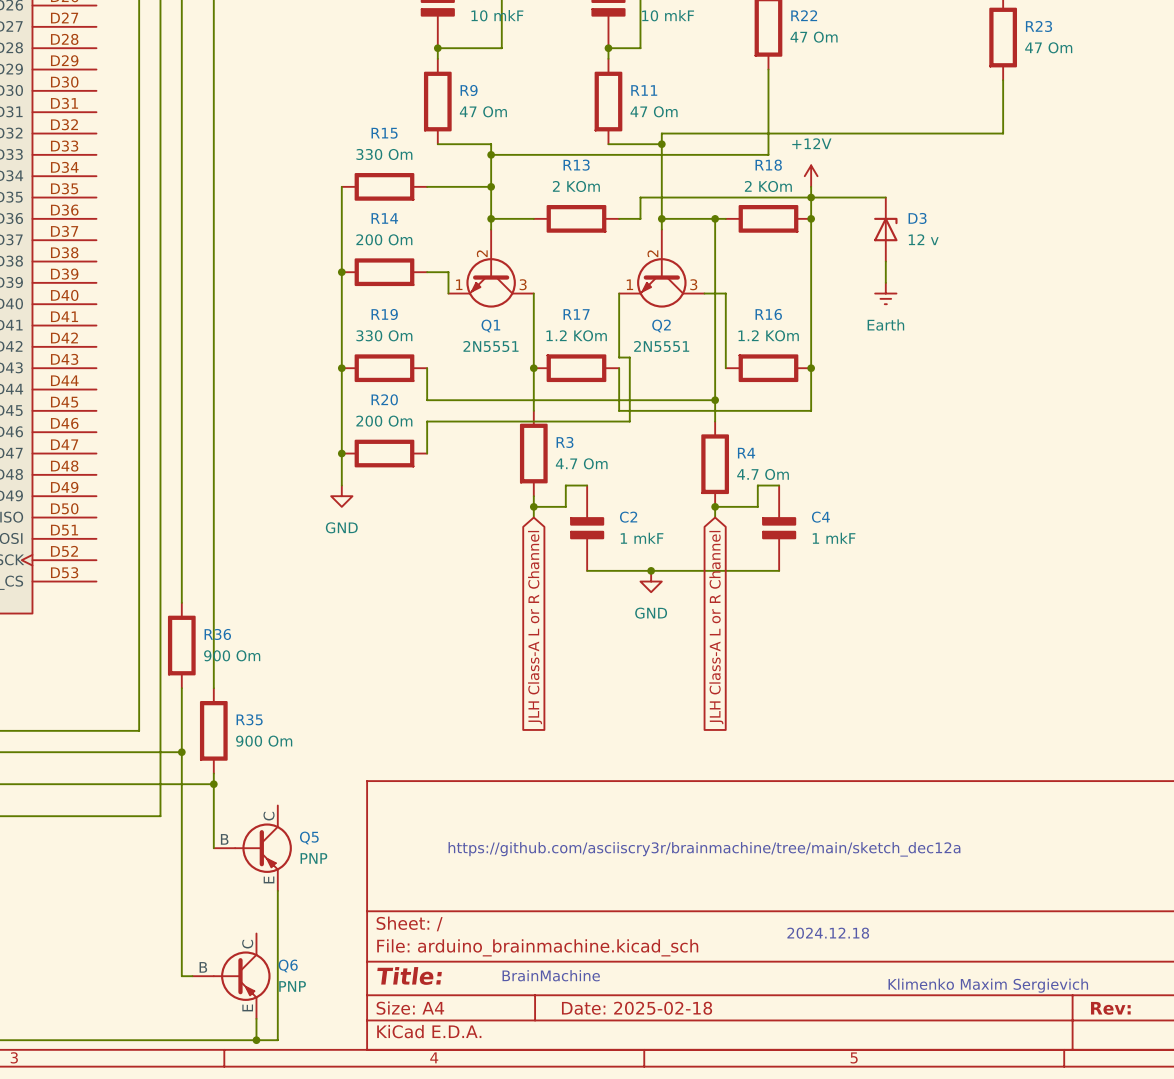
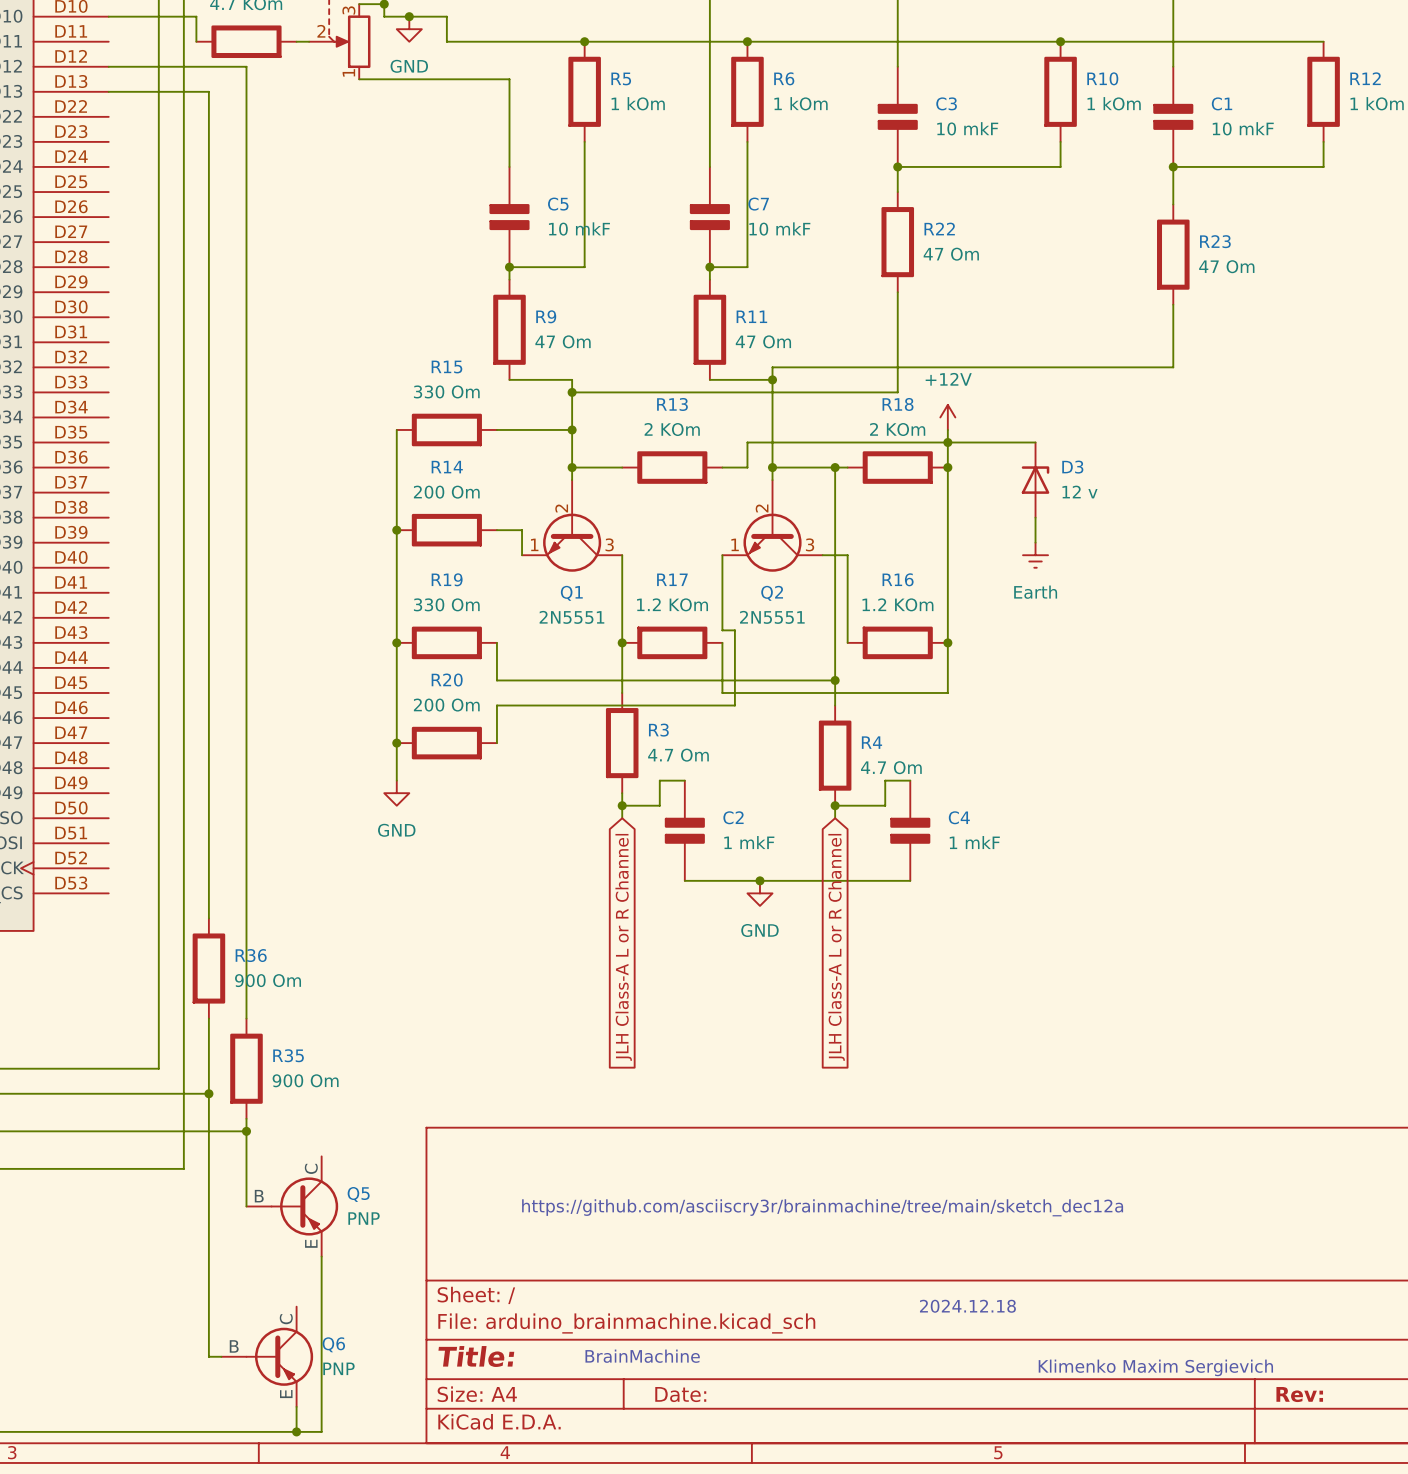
title block: Date: 2025-02-18 (637, 1008) -> Date: (680, 1394)

